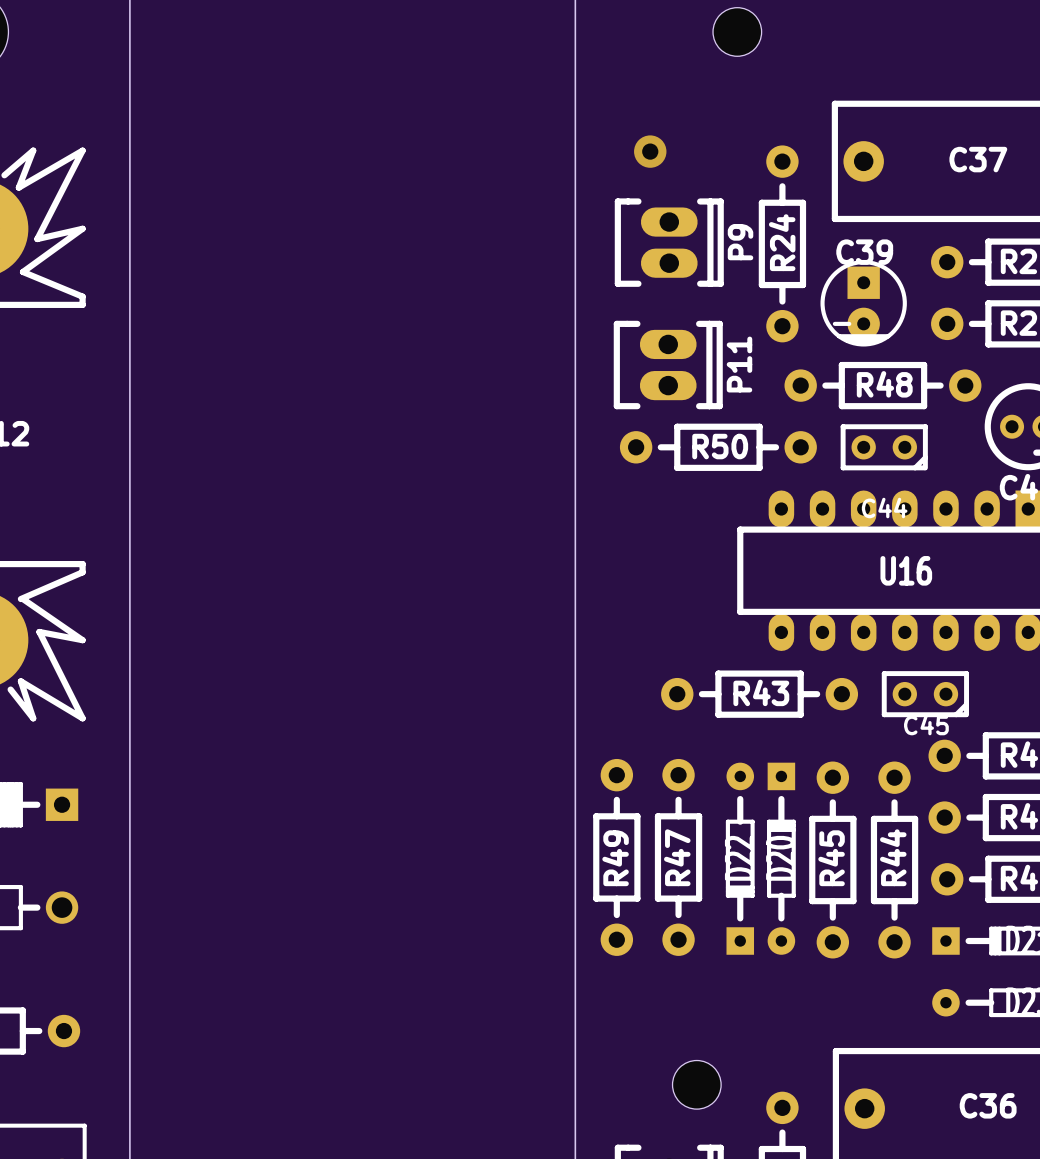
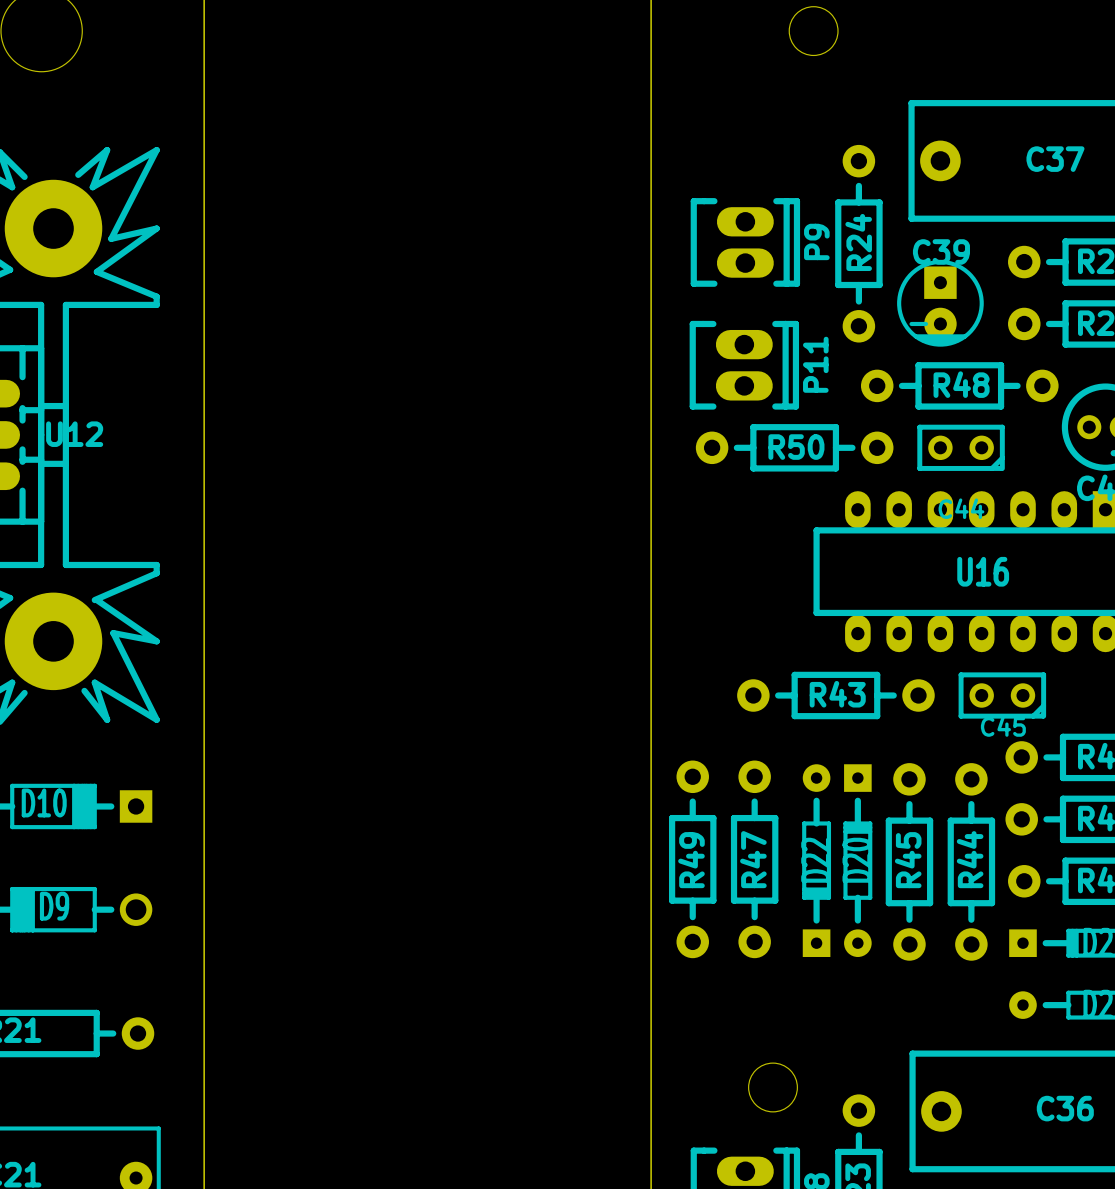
via: (650, 151) -> none

